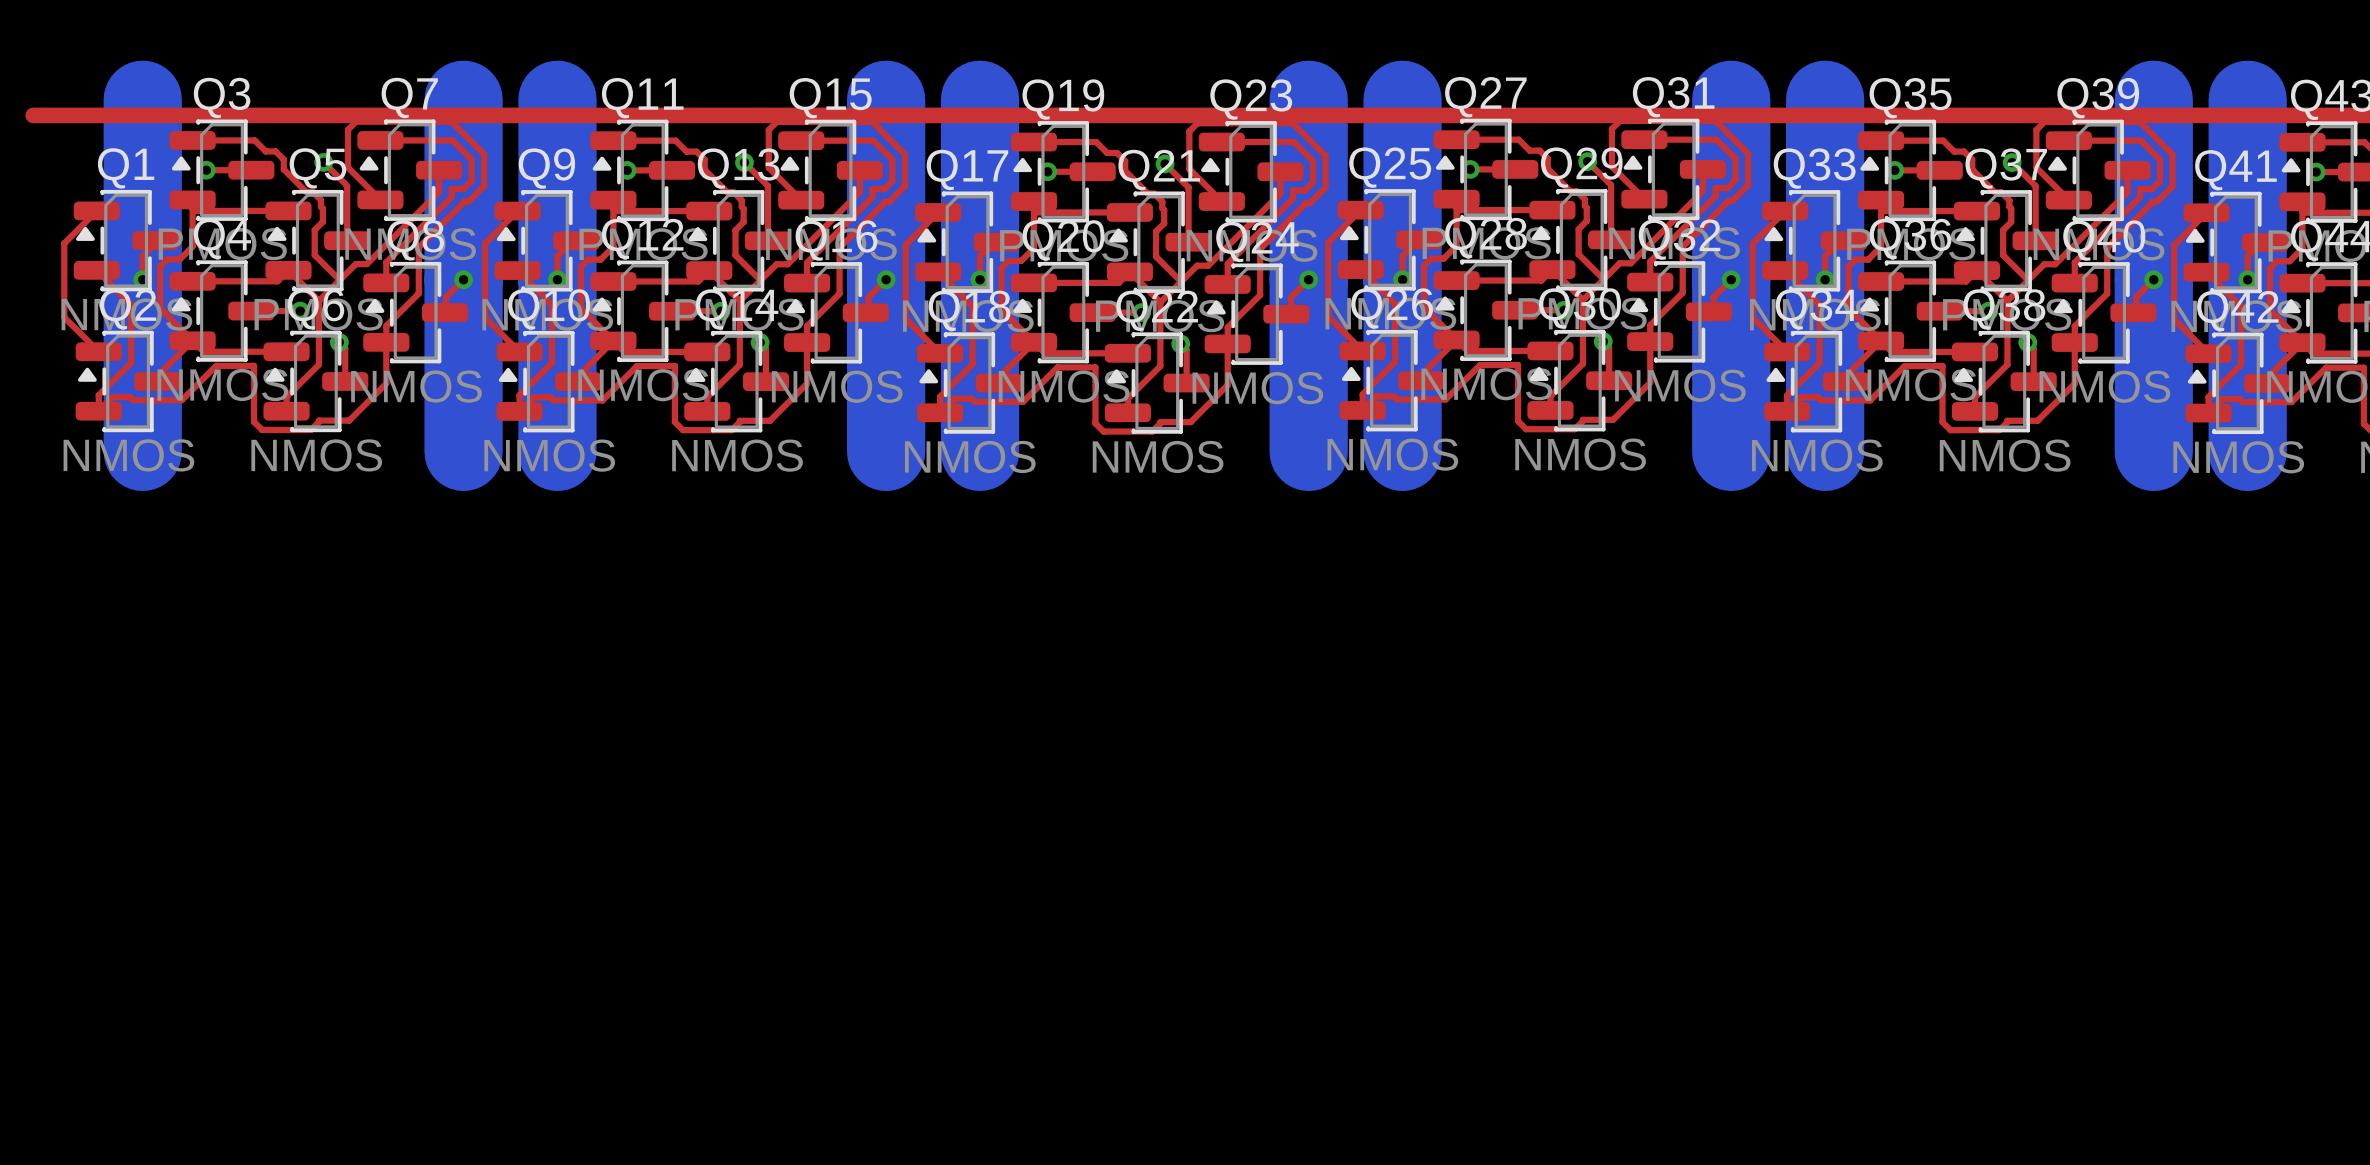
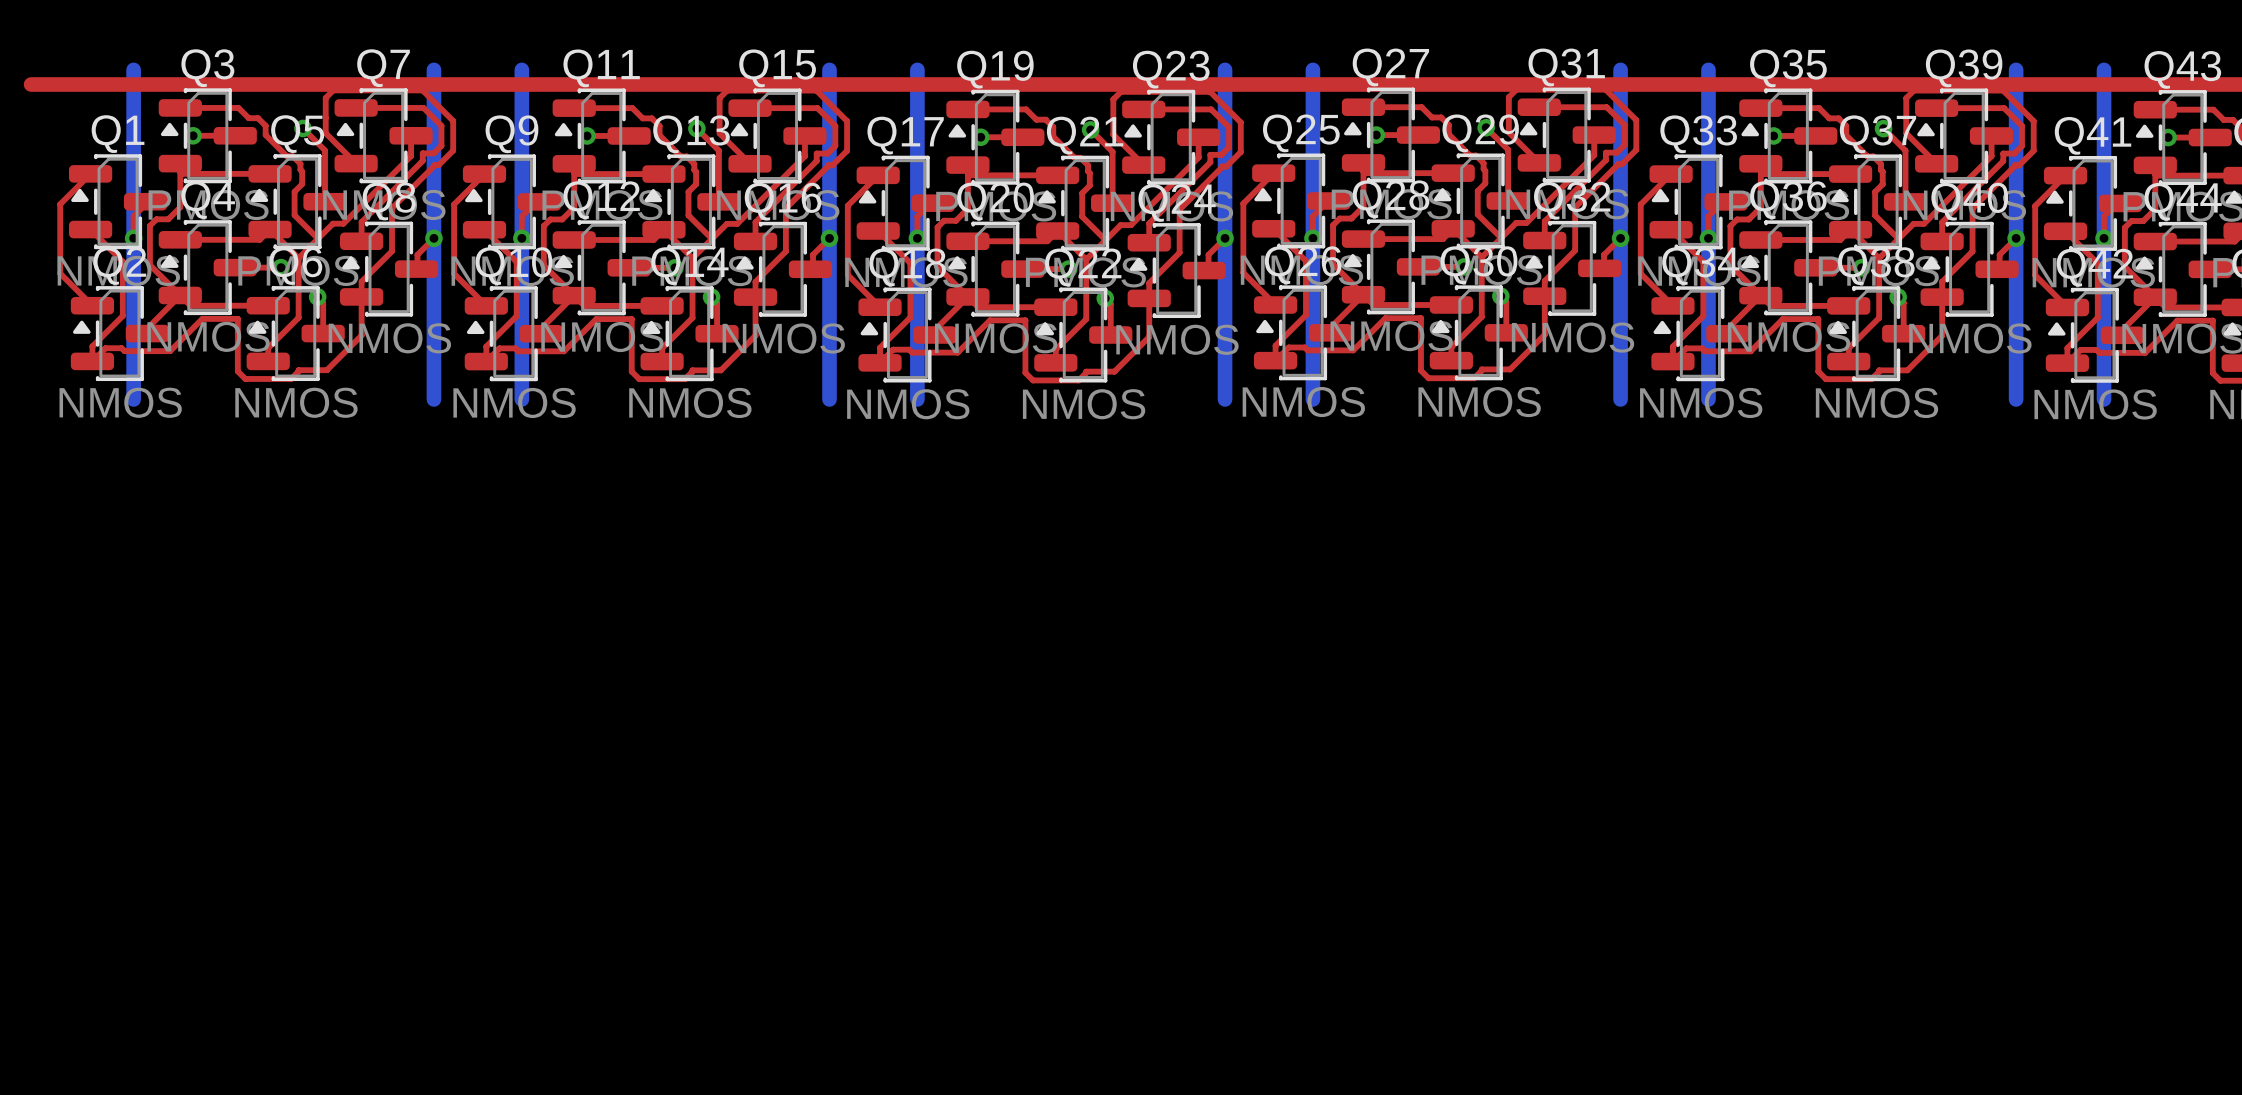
bottom track width: thick (142, 99) (142, 451) -> thin (133, 69) (133, 399)
bottom track width: thick (463, 99) (463, 451) -> thin (433, 69) (433, 399)
bottom track width: thick (557, 99) (557, 451) -> thin (521, 69) (521, 399)
bottom track width: thick (886, 99) (886, 451) -> thin (829, 69) (829, 399)
bottom track width: thick (980, 99) (980, 451) -> thin (917, 69) (917, 399)
bottom track width: thick (1308, 99) (1308, 451) -> thin (1225, 69) (1225, 399)
bottom track width: thick (1402, 99) (1402, 451) -> thin (1312, 69) (1312, 399)
bottom track width: thick (1731, 99) (1731, 451) -> thin (1620, 69) (1620, 399)
bottom track width: thick (1825, 99) (1825, 451) -> thin (1708, 69) (1708, 399)
bottom track width: thick (2153, 99) (2153, 451) -> thin (2016, 69) (2016, 399)
bottom track width: thick (2247, 99) (2247, 451) -> thin (2104, 69) (2104, 399)

